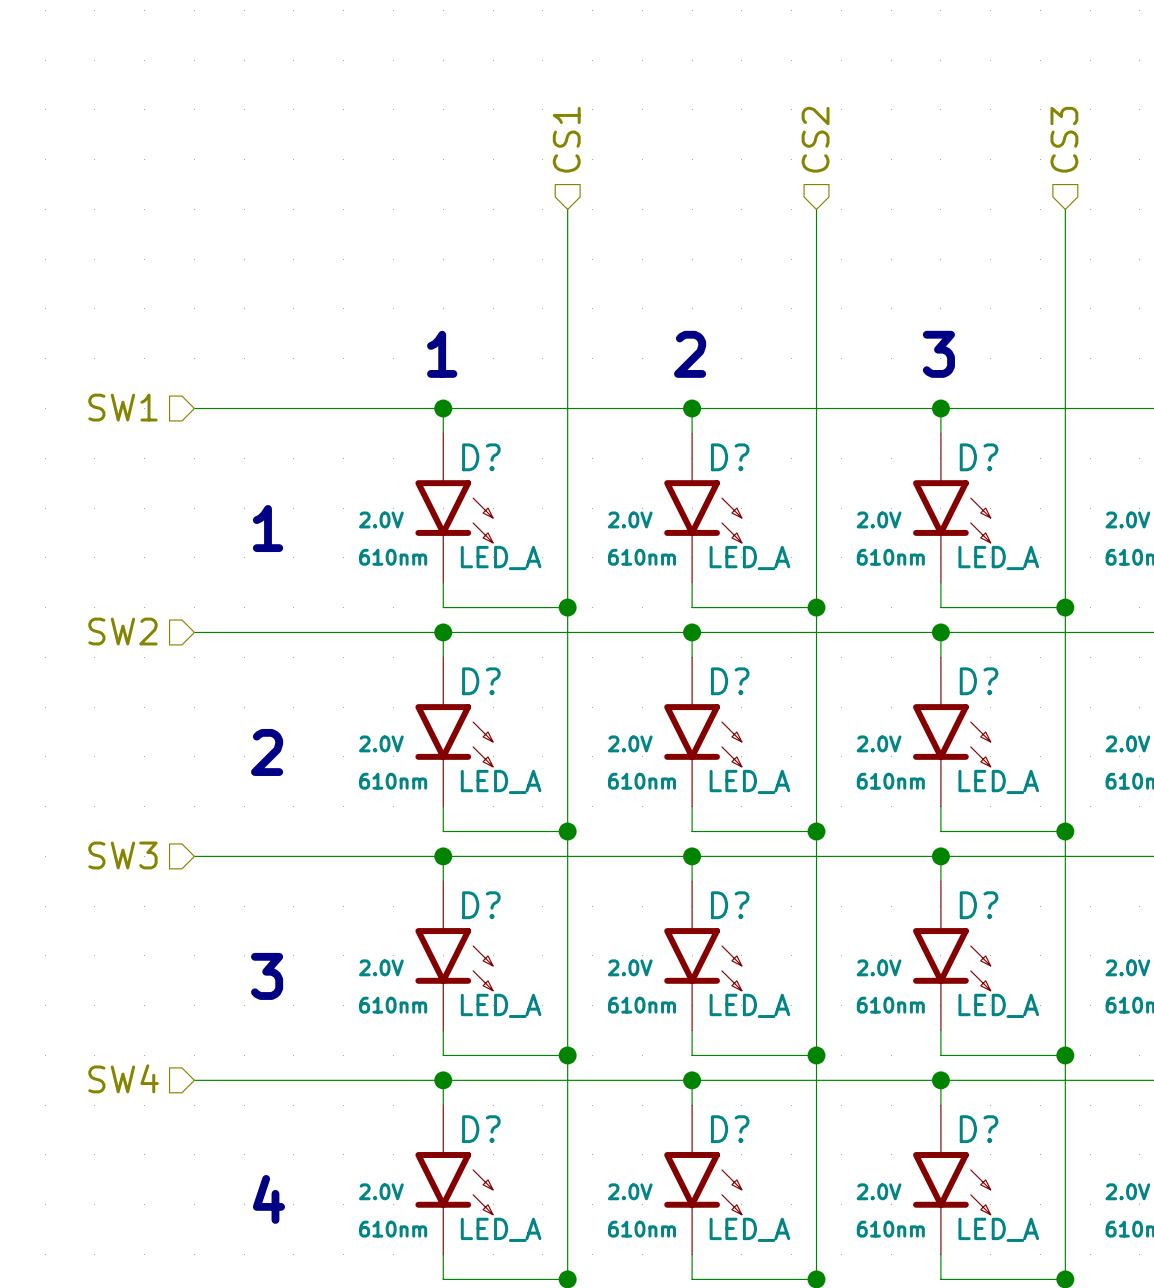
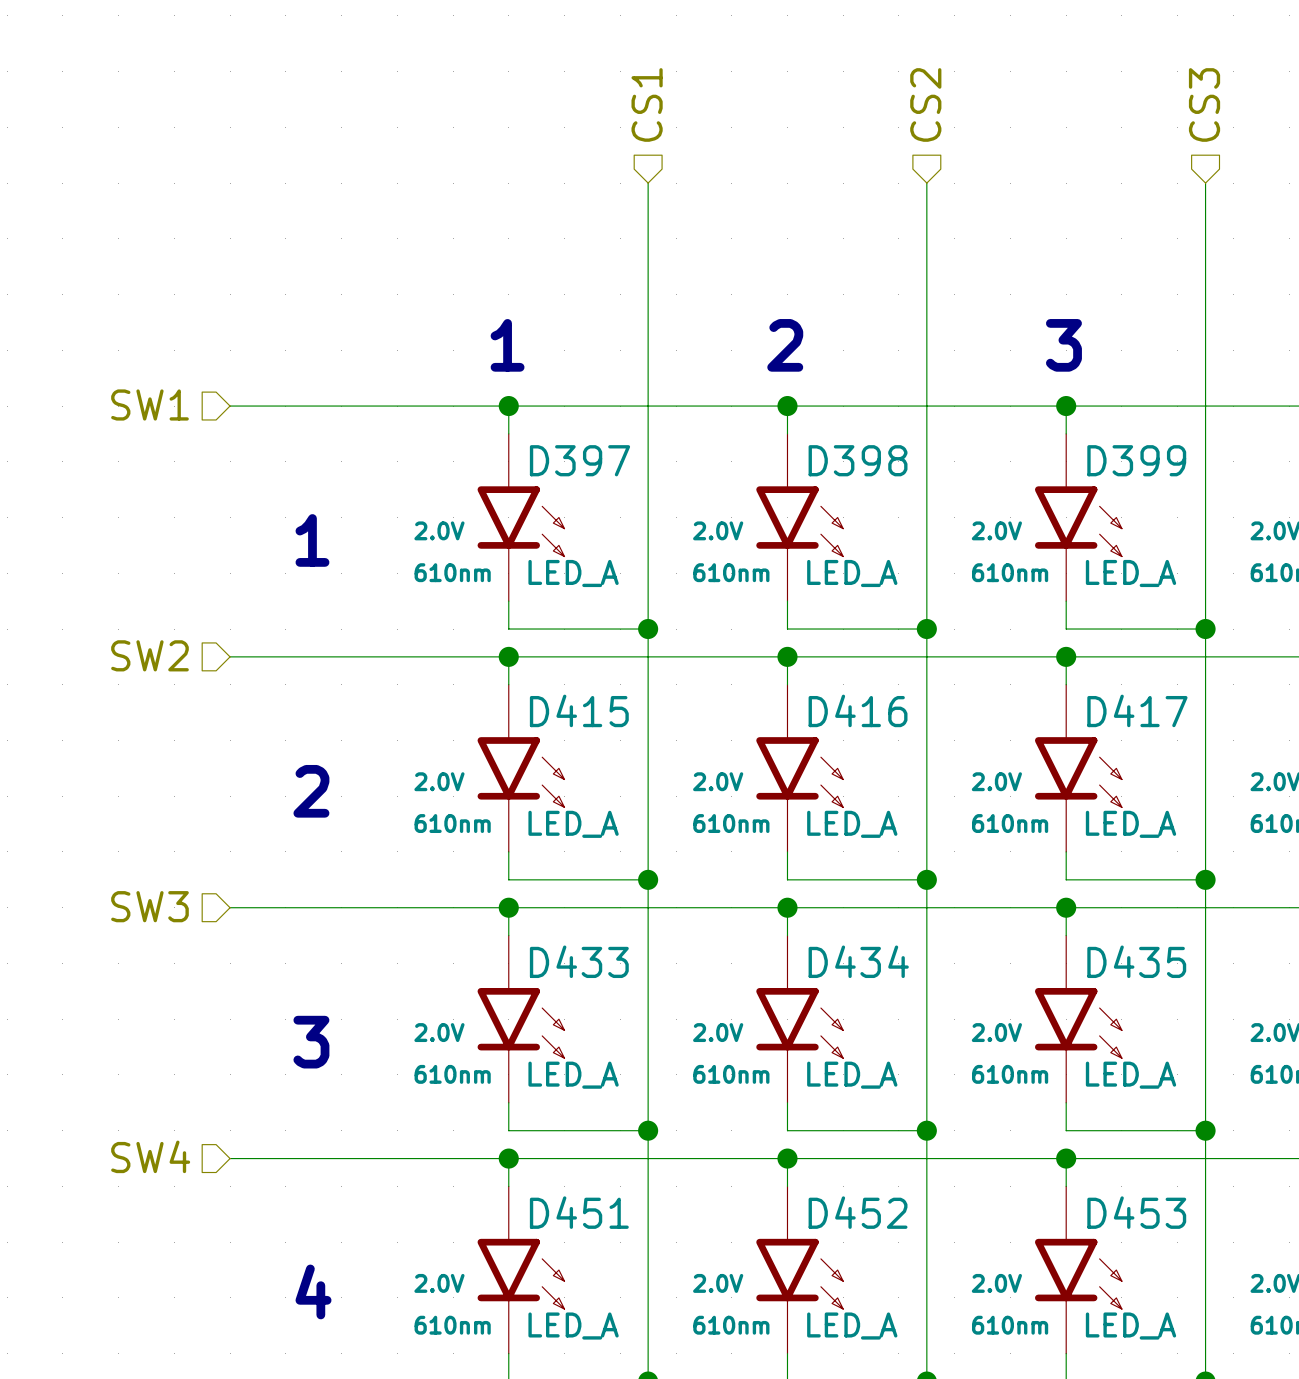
D? name: D? (481, 457) -> D397 (579, 460)
D? name: D? (730, 457) -> D398 (858, 460)
D? name: D? (979, 457) -> D399 (1136, 460)
D? name: D? (481, 681) -> D415 (579, 710)
D? name: D? (730, 681) -> D416 (858, 710)
D? name: D? (979, 681) -> D417 (1137, 710)
D? name: D? (481, 905) -> D433 (579, 961)
D? name: D? (730, 905) -> D434 (858, 961)
D? name: D? (979, 905) -> D435 (1136, 961)
D? name: D? (481, 1129) -> D451 (579, 1212)
D? name: D? (730, 1129) -> D452 (858, 1212)
D? name: D? (979, 1129) -> D453 (1136, 1212)

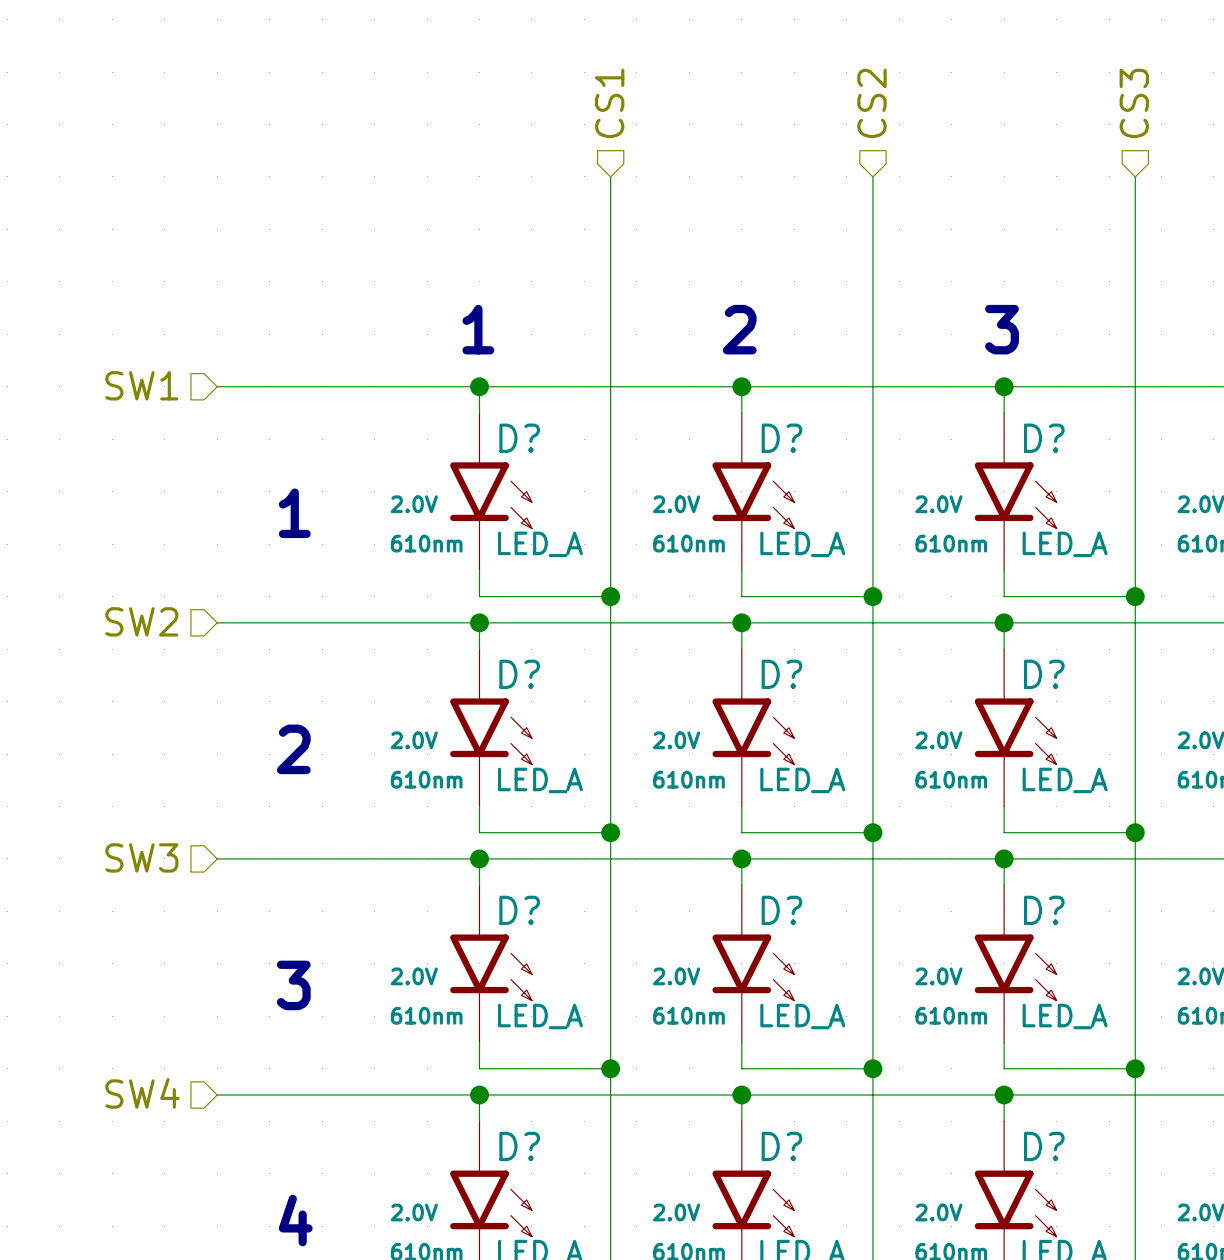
D397 name: D397 (579, 460) -> D? (519, 438)
D398 name: D398 (858, 460) -> D? (781, 438)
D399 name: D399 (1136, 460) -> D? (1044, 438)
D415 name: D415 (579, 710) -> D? (519, 674)
D416 name: D416 (858, 710) -> D? (781, 674)
D417 name: D417 (1137, 710) -> D? (1044, 674)
D433 name: D433 (579, 961) -> D? (519, 910)
D434 name: D434 (858, 961) -> D? (781, 910)
D435 name: D435 (1136, 961) -> D? (1044, 910)
D451 name: D451 (579, 1212) -> D? (519, 1146)
D452 name: D452 (858, 1212) -> D? (781, 1146)
D453 name: D453 (1136, 1212) -> D? (1044, 1146)

